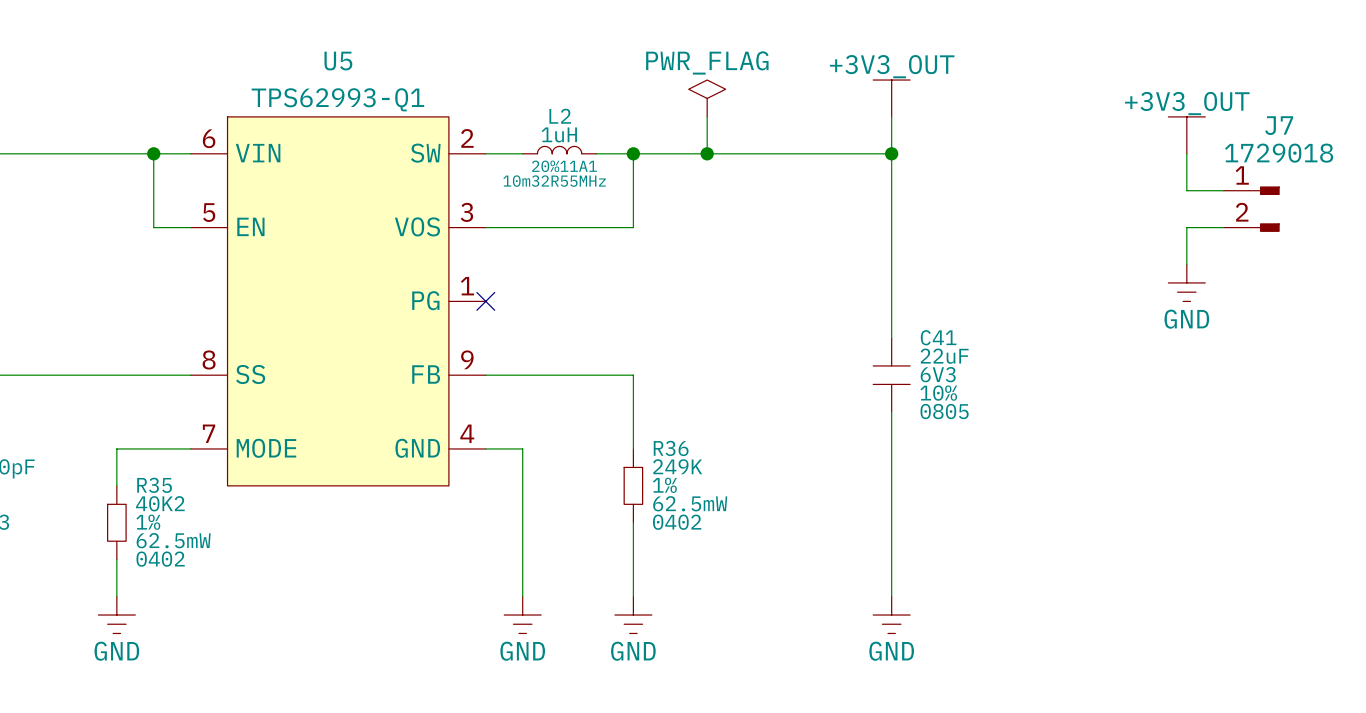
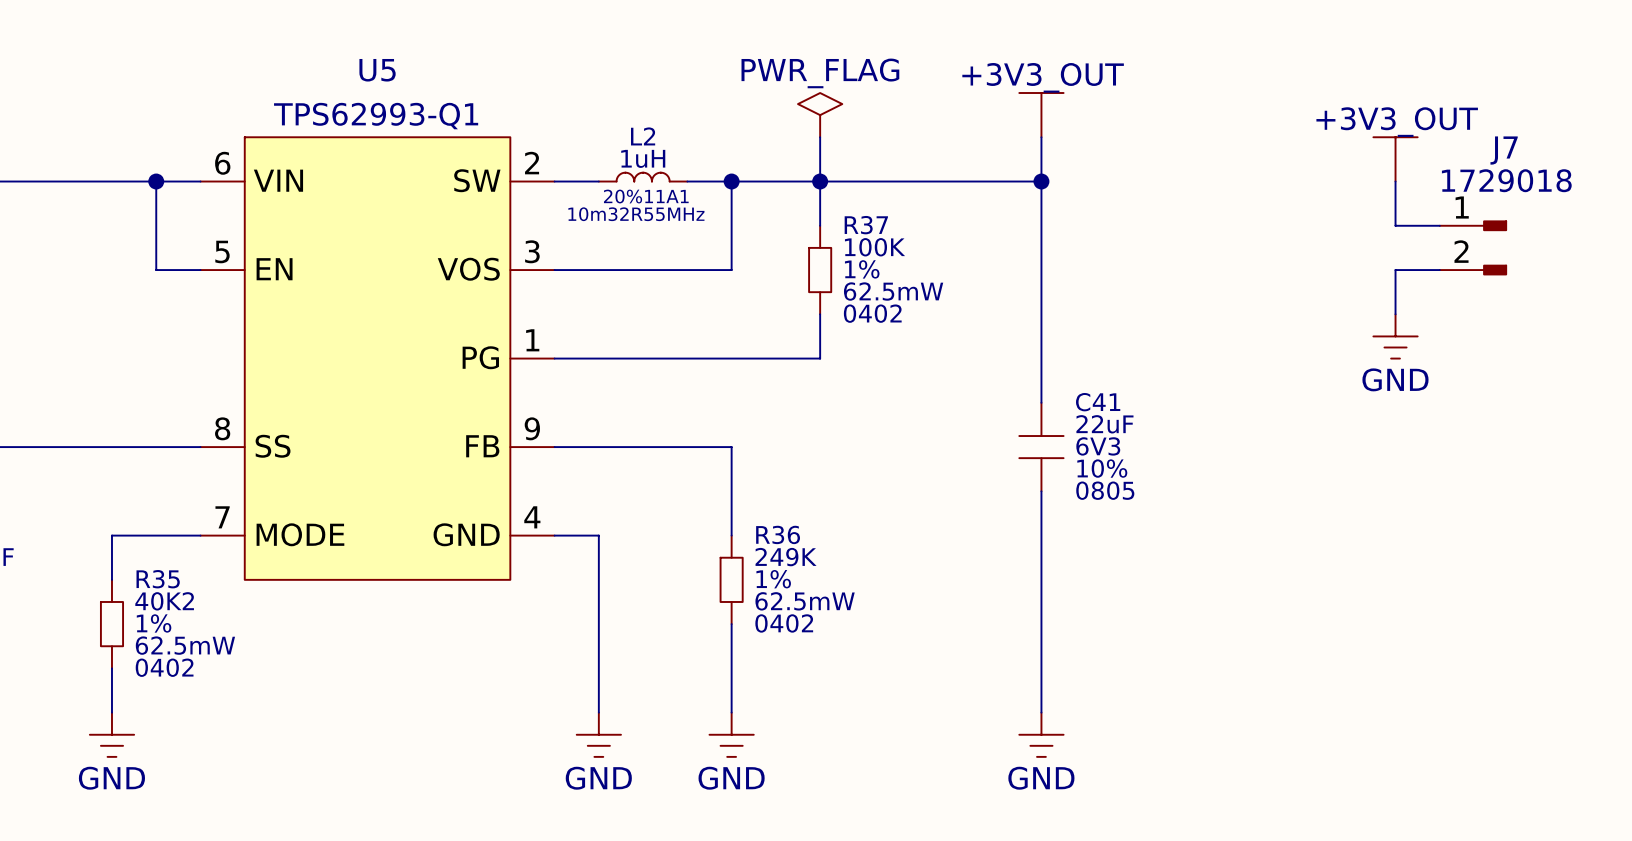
wire: none -> (820, 181) (820, 225)
R37: none -> 100K (820, 270)
wire: none -> (820, 314) (820, 358) (554, 358)
no-connect mark: (485, 301) -> none

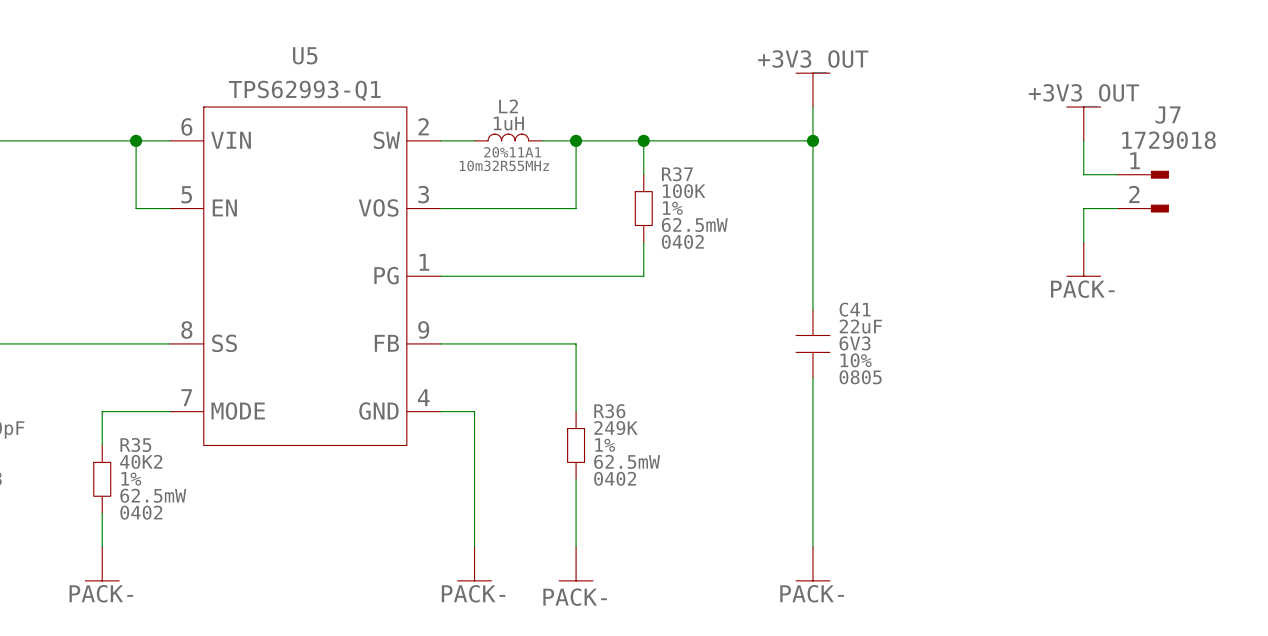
power symbol: PWR_FLAG (820, 115) -> none
wire: (820, 137) (820, 181) -> none
power symbol: GND (1395, 336) -> PACK- (1083, 259)
power symbol: GND (111, 734) -> PACK- (102, 563)
power symbol: GND (598, 734) -> PACK- (474, 563)
power symbol: GND (731, 734) -> PACK- (576, 563)
power symbol: GND (1041, 734) -> PACK- (812, 563)

